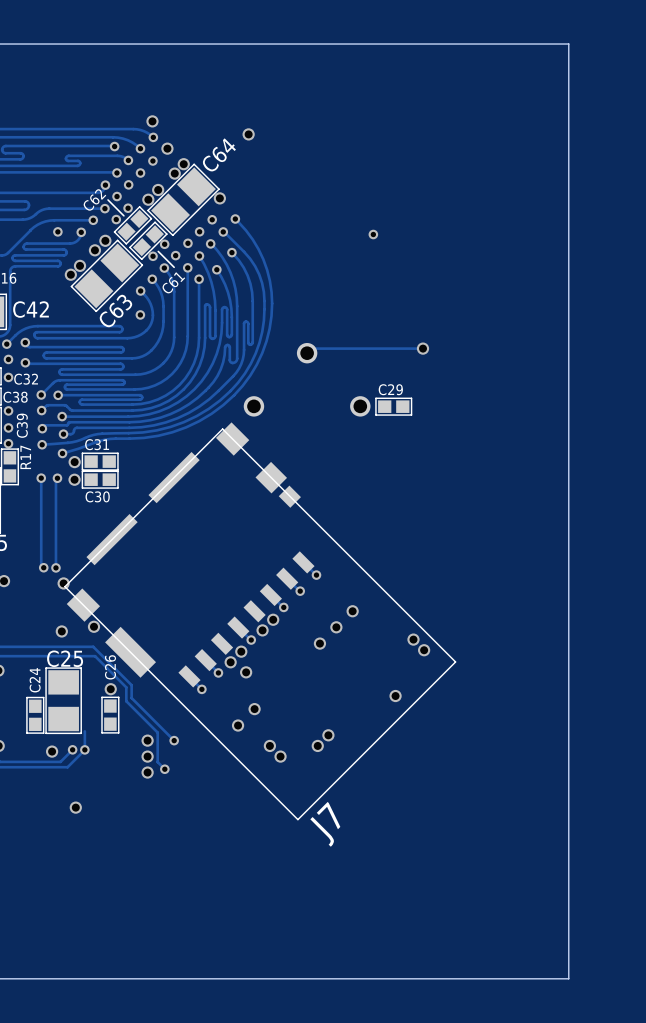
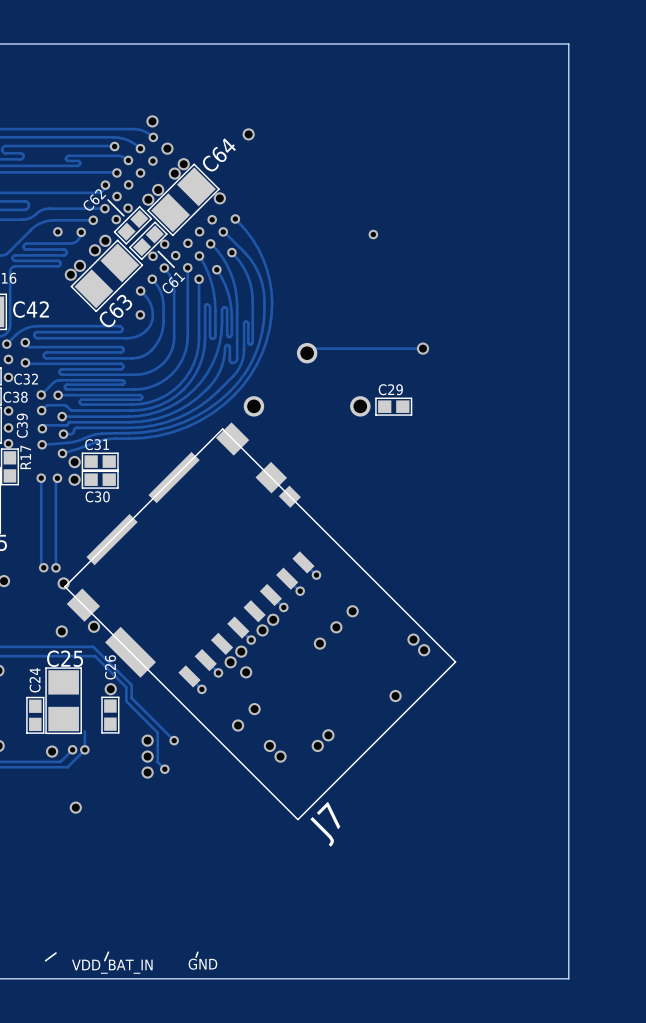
line: none -> (108, 952) (104, 960)
line: none -> (197, 952) (196, 957)
line: none -> (56, 953) (45, 960)
text: none -> GND (202, 964)
text: none -> VDD_BAT_IN (112, 966)

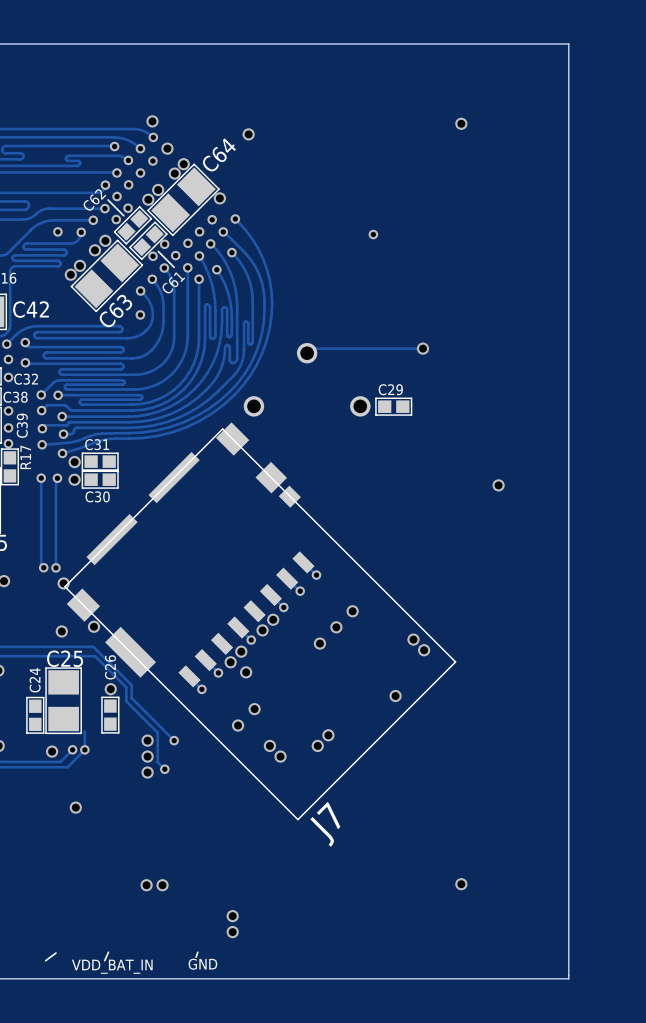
via: none -> (461, 123)
via: none -> (498, 485)
via: none -> (461, 884)
via: none -> (146, 885)
via: none -> (162, 885)
via: none -> (232, 916)
via: none -> (232, 932)

